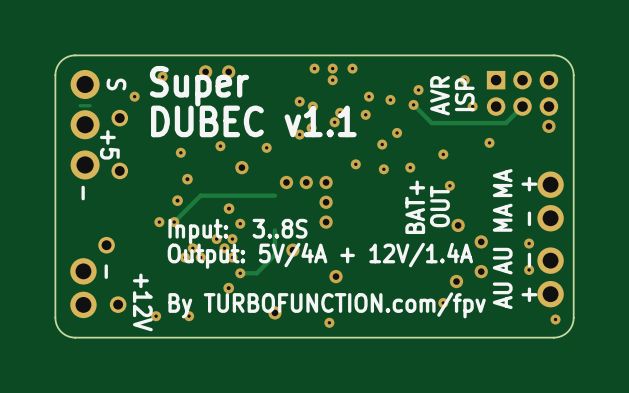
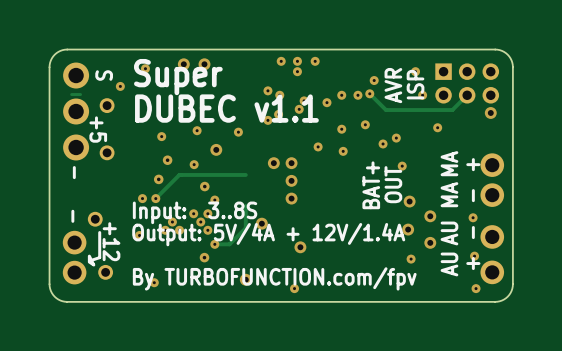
via: (369, 96) -> none
via: (390, 99) -> none
via: none -> (341, 95)
via: none -> (357, 95)
via: (397, 132) -> none
via: none -> (365, 124)
via: none -> (383, 143)
via: (410, 167) -> none
via: (286, 182) -> none
via: none -> (194, 164)
text position: Input: 3..8S (237, 231) -> Input: 3..8S (195, 212)
part footprint: [537, 247, 564, 308] -> [480, 225, 505, 285]
text position: Output: 5V/4A + 12V/1.4A (320, 255) -> Output: 5V/4A + 12V/1.4A (268, 234)
line: none -> (99, 232) (99, 257) (90, 260)
via: none -> (139, 235)
via position: (529, 269) -> (474, 256)
text position: - (106, 271) -> - (72, 216)
via position: (456, 281) -> (408, 229)
drawing: none -> [87, 254, 96, 267]
text: +12V (142, 302) -> +12 (111, 241)
via position: (443, 302) -> (411, 259)
text position: By TURBOFUNCTION.com/fpv (327, 305) -> By TURBOFUNCTION.com/fpv (274, 278)
via: (156, 316) -> none
via: none -> (154, 282)
via: (189, 316) -> none
via: (555, 319) -> none
via: none -> (476, 288)

